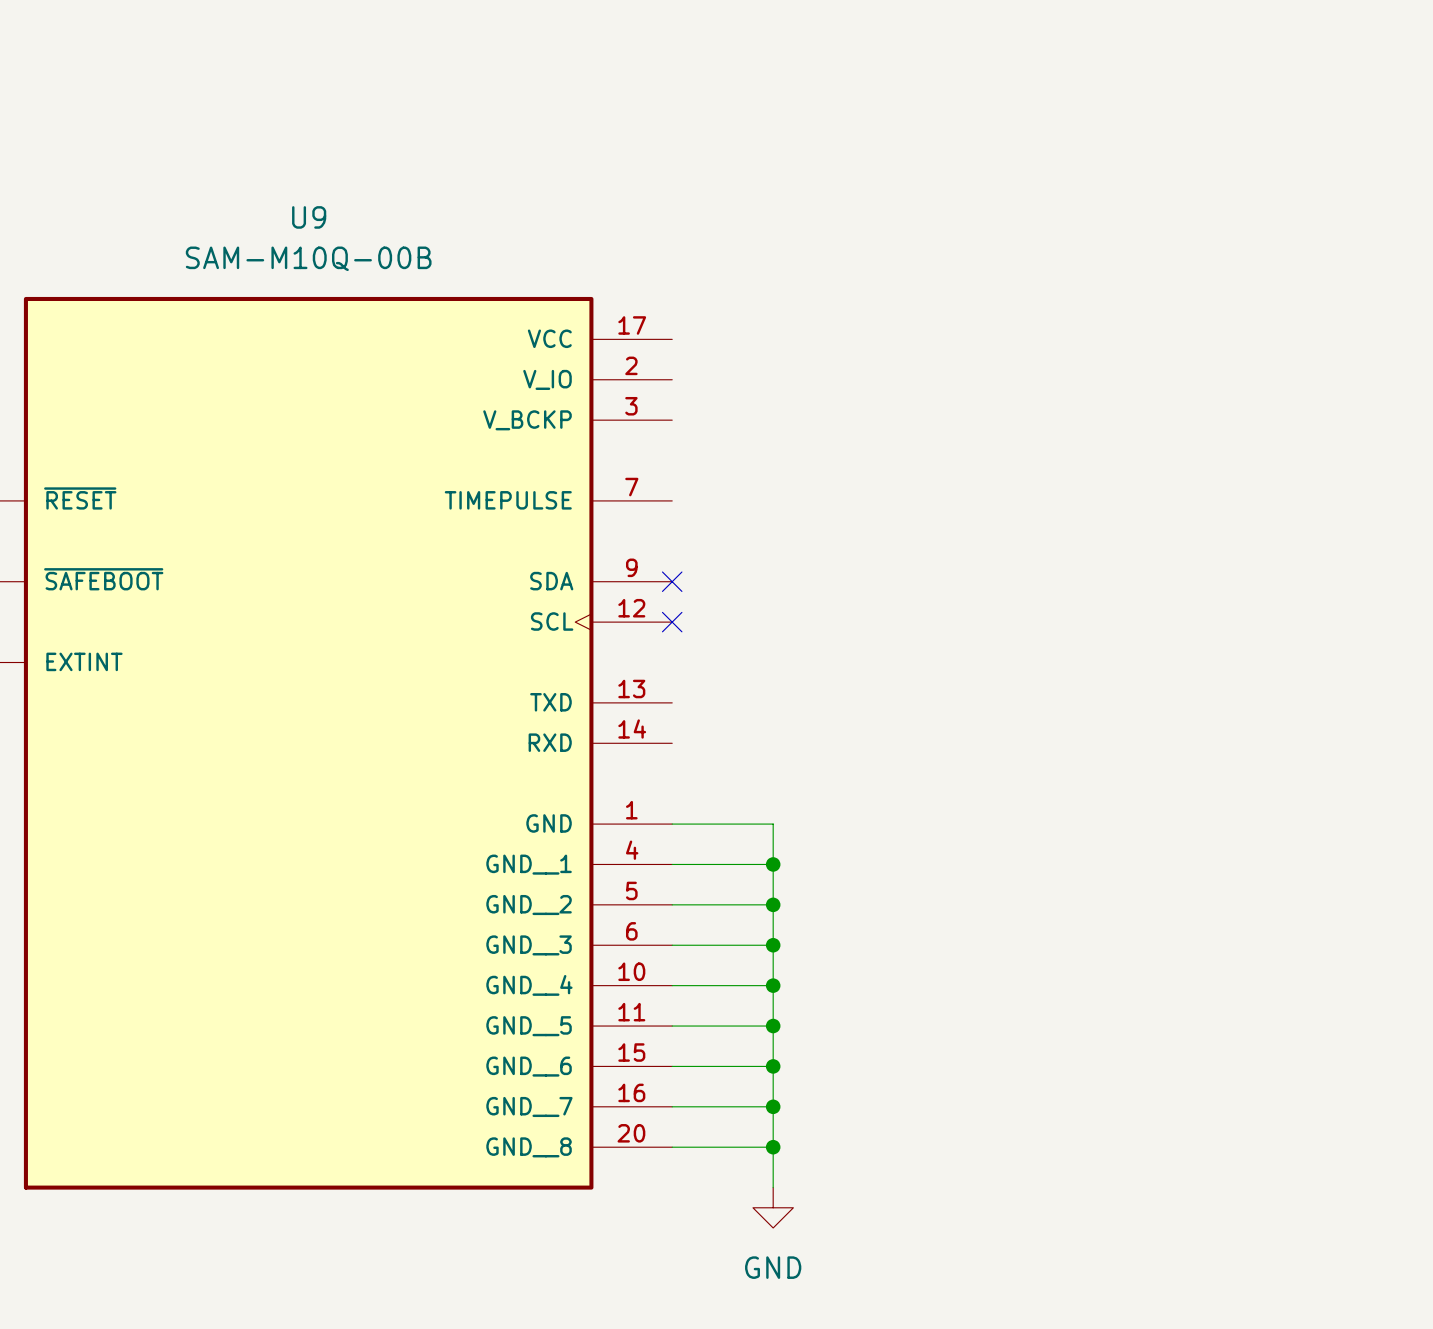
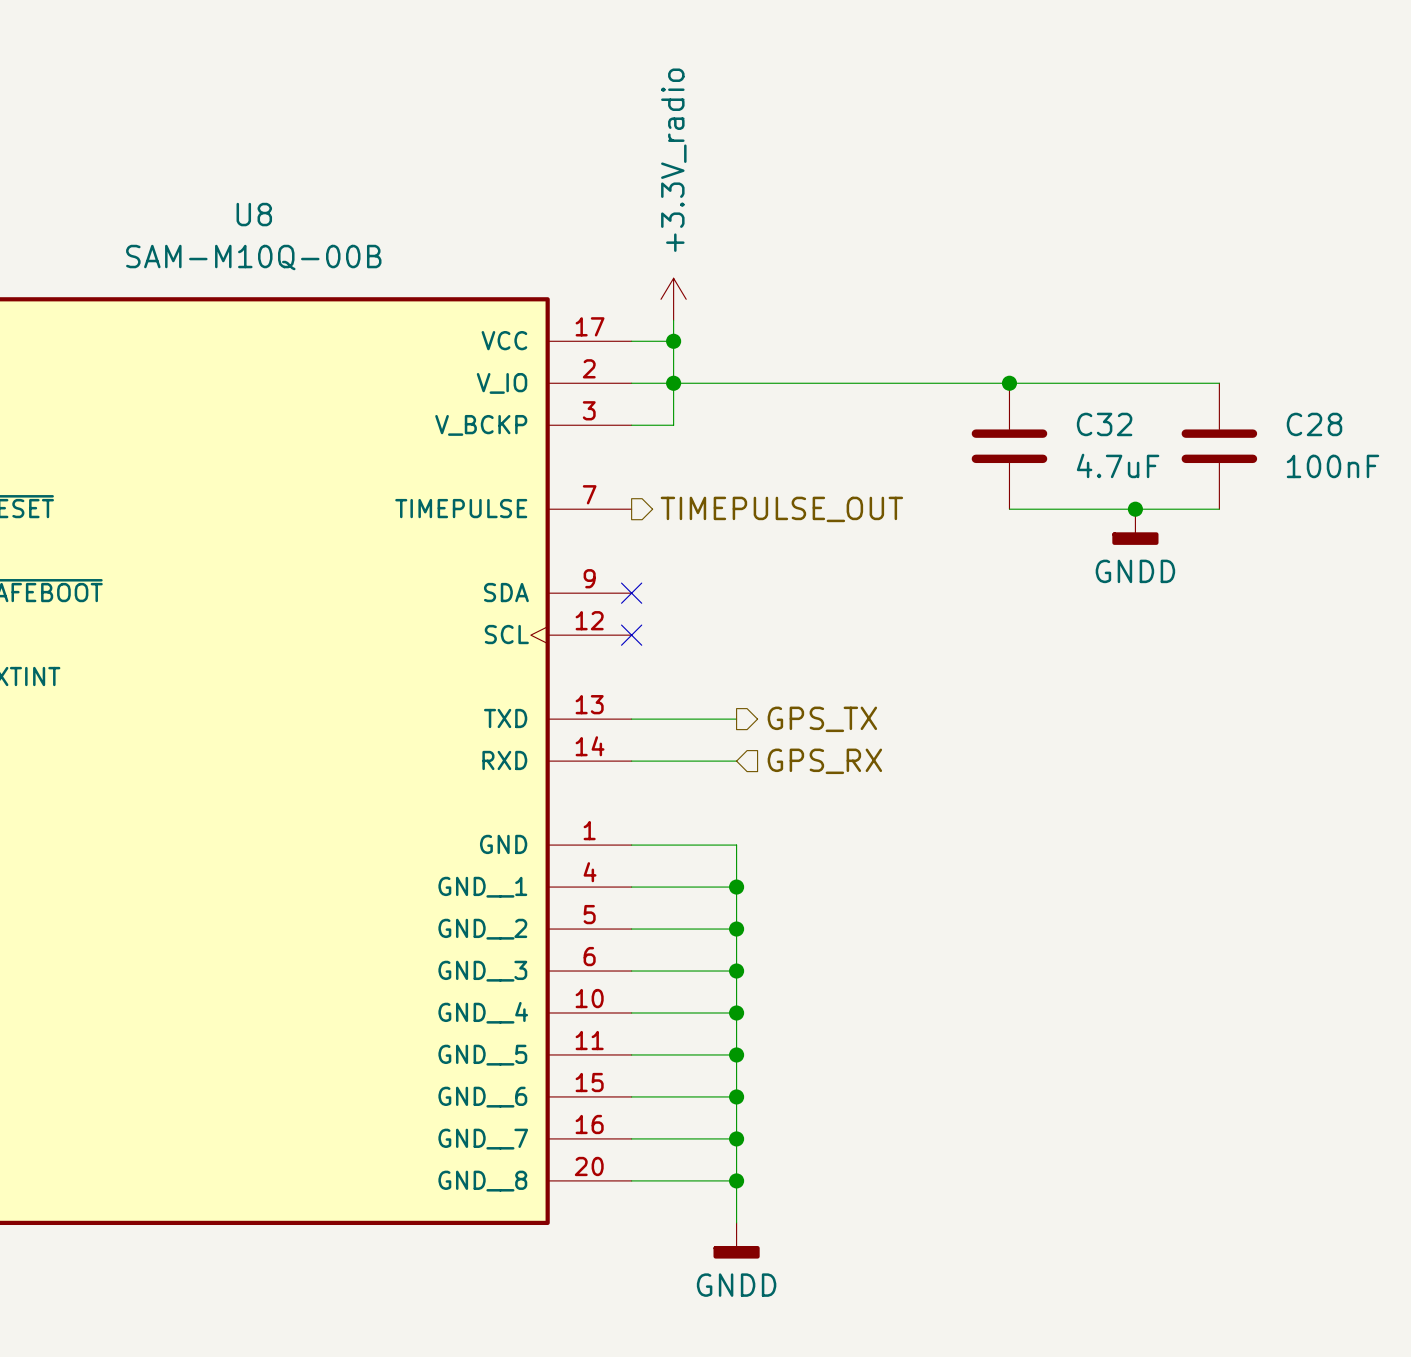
U9 name: U9 (309, 217) -> U8 (254, 214)
power symbol: none -> +3.3V_radio (673, 299)
wire: none -> (673, 320) (673, 425) (631, 425)
wire: none -> (631, 341) (673, 341)
junction: none -> (673, 341)
wire: none -> (631, 383) (1219, 383)
junction: none -> (673, 383)
junction: none -> (1009, 383)
C32: none -> 4.7uF (1009, 446)
C28: none -> 100nF (1219, 446)
wire: none -> (1009, 509) (1219, 509)
junction: none -> (1135, 509)
hierarchical label: none -> TIMEPULSE_OUT (781, 509)
power symbol: none -> GNDD (1135, 527)
wire: none -> (631, 719) (736, 719)
hierarchical label: none -> GPS_TX (822, 719)
wire: none -> (631, 761) (736, 761)
hierarchical label: none -> GPS_RX (824, 761)
power symbol: GND (773, 1207) -> GNDD (736, 1240)

